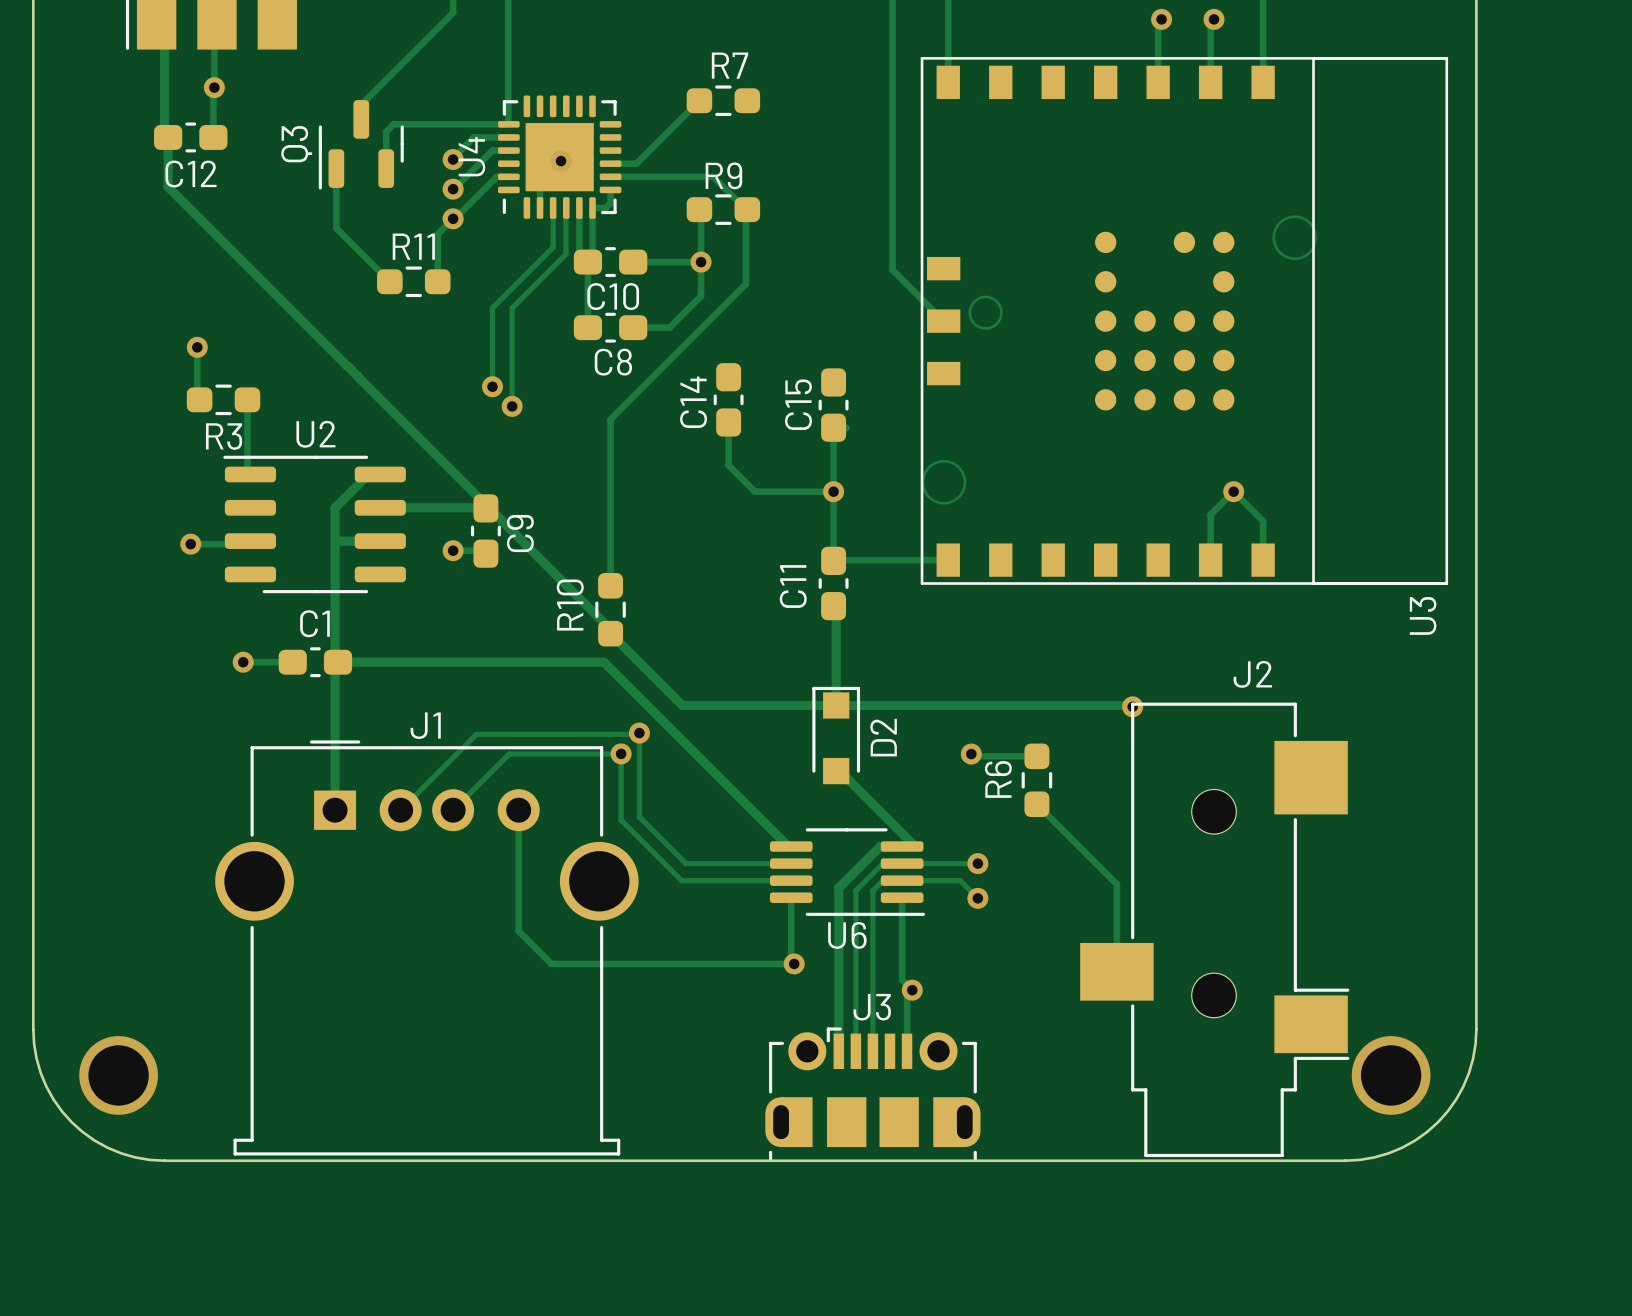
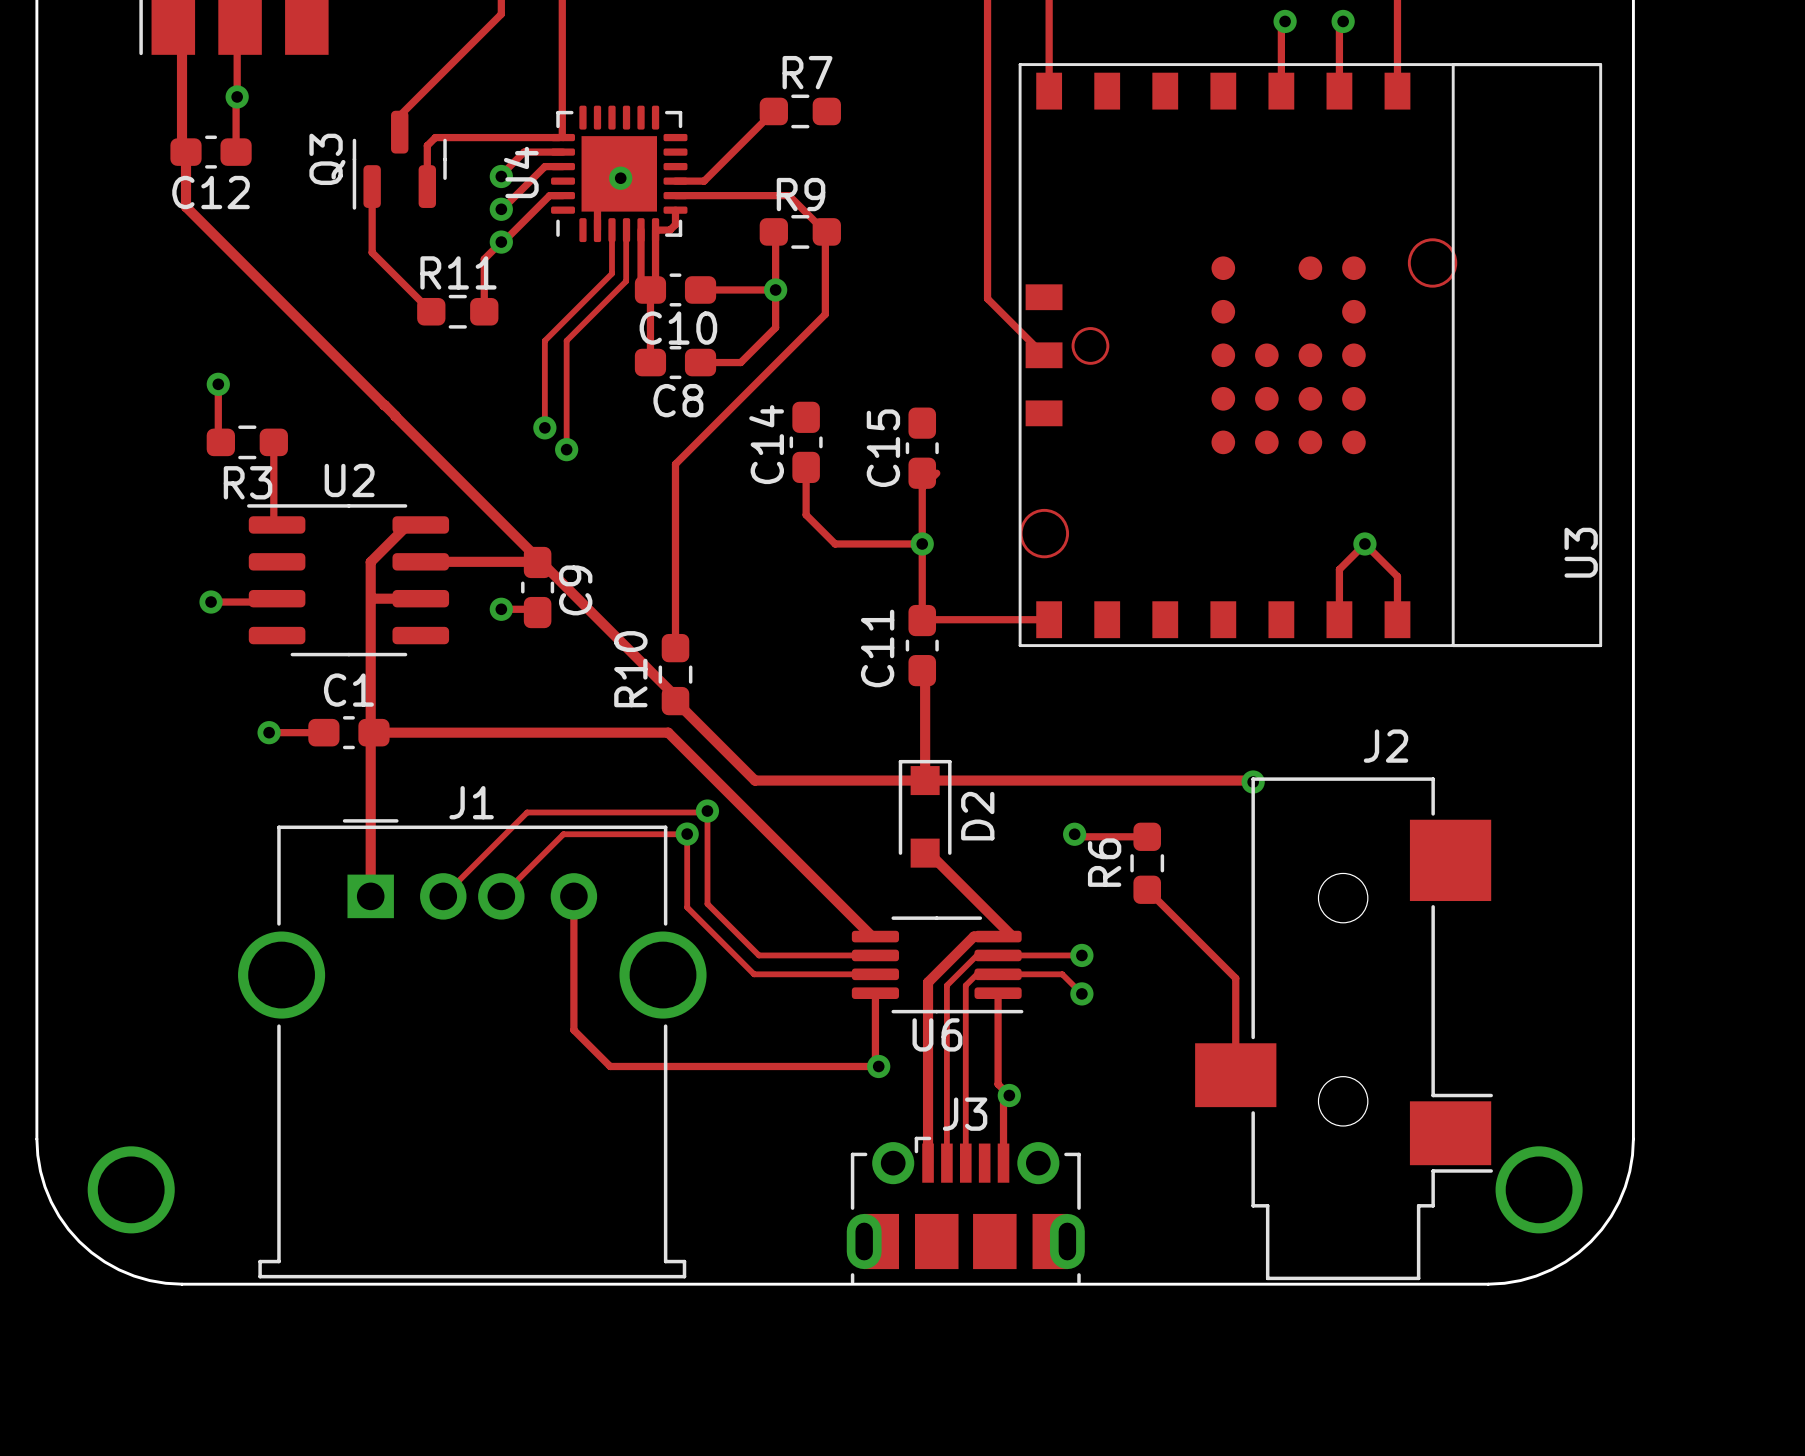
U3 name position: U3 (1423, 615) -> U3 (1581, 552)

